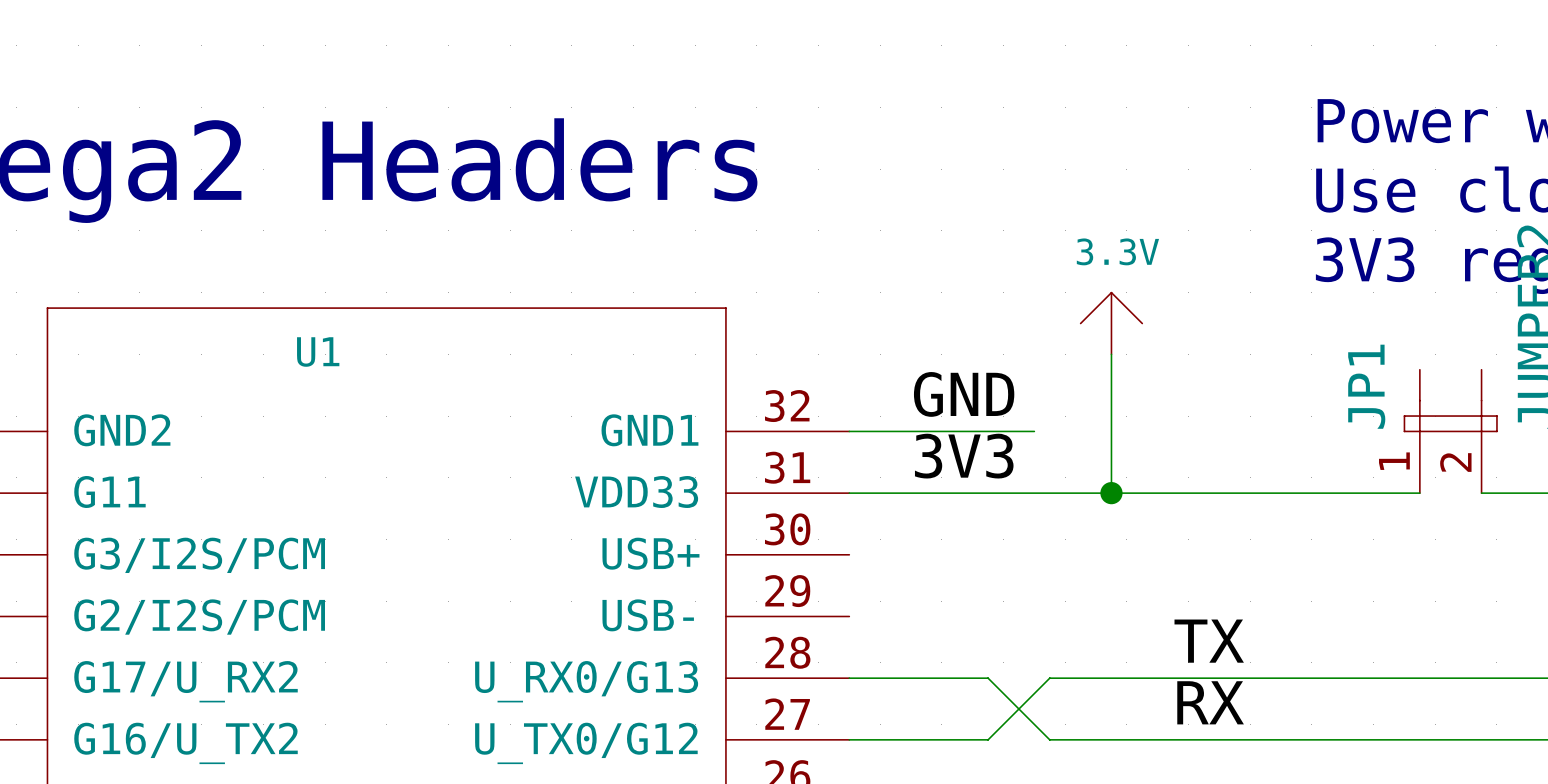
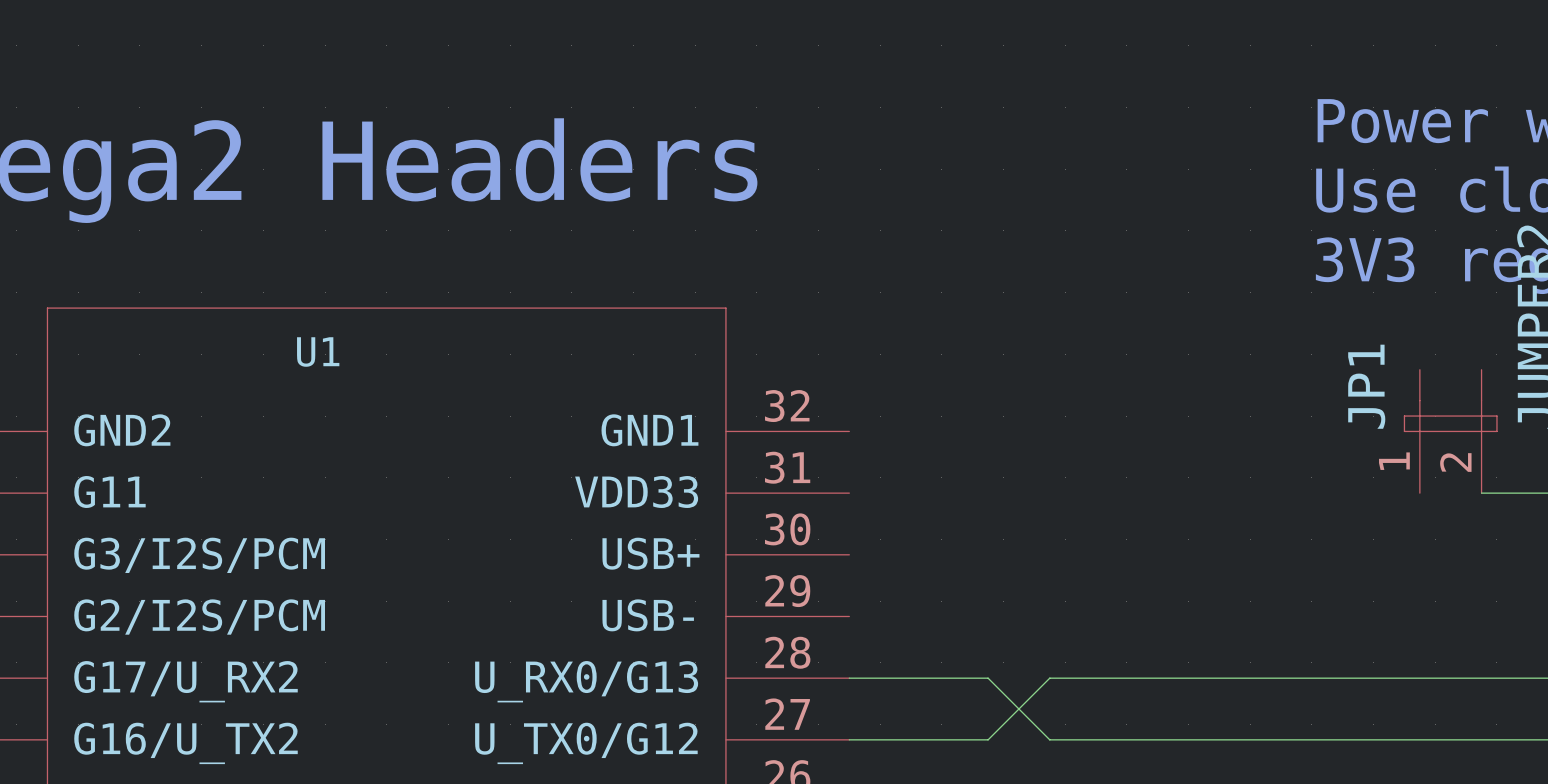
power symbol: 3.3V (1111, 323) -> none
wire: (1111, 354) (1111, 493) -> none
label: GND (964, 394) -> none
wire: (849, 431) (1034, 431) -> none
label: 3V3 (964, 456) -> none
wire: (849, 493) (1419, 493) -> none
junction: (1111, 493) -> none
label: TX (1209, 641) -> none
label: RX (1210, 702) -> none

